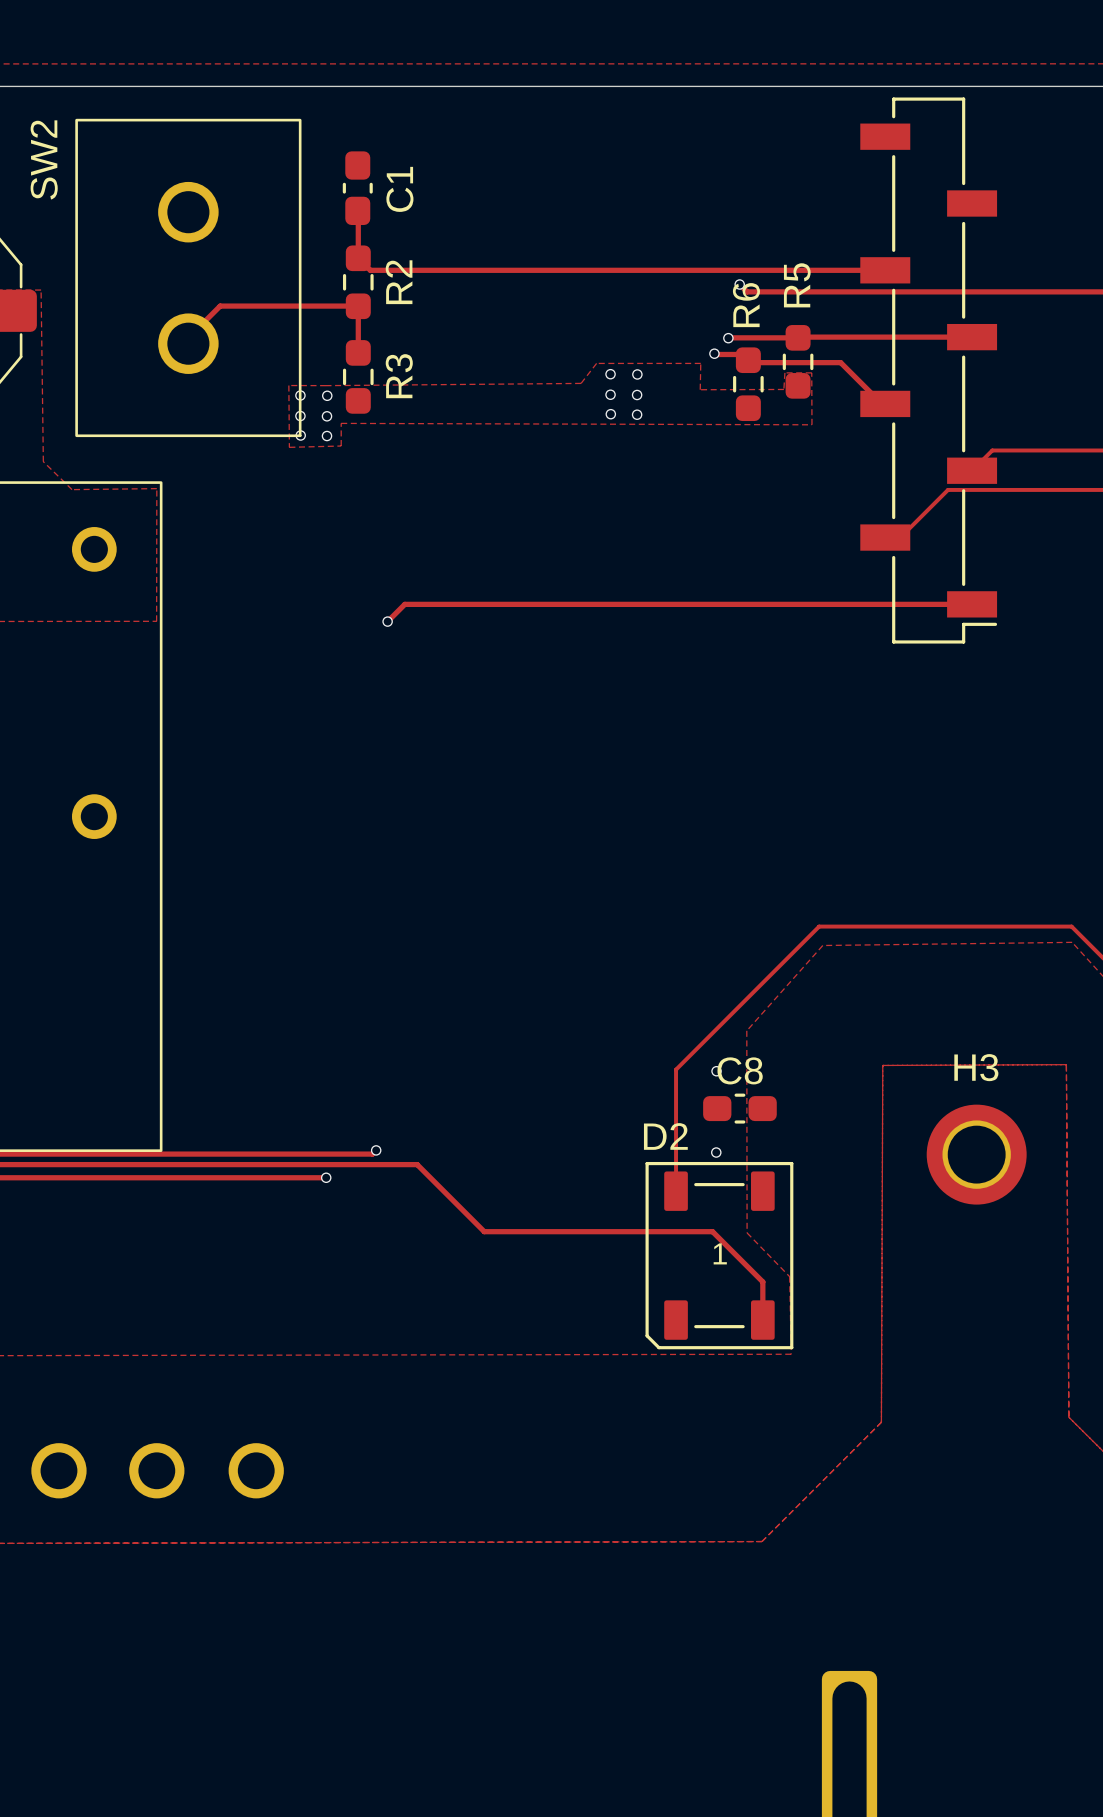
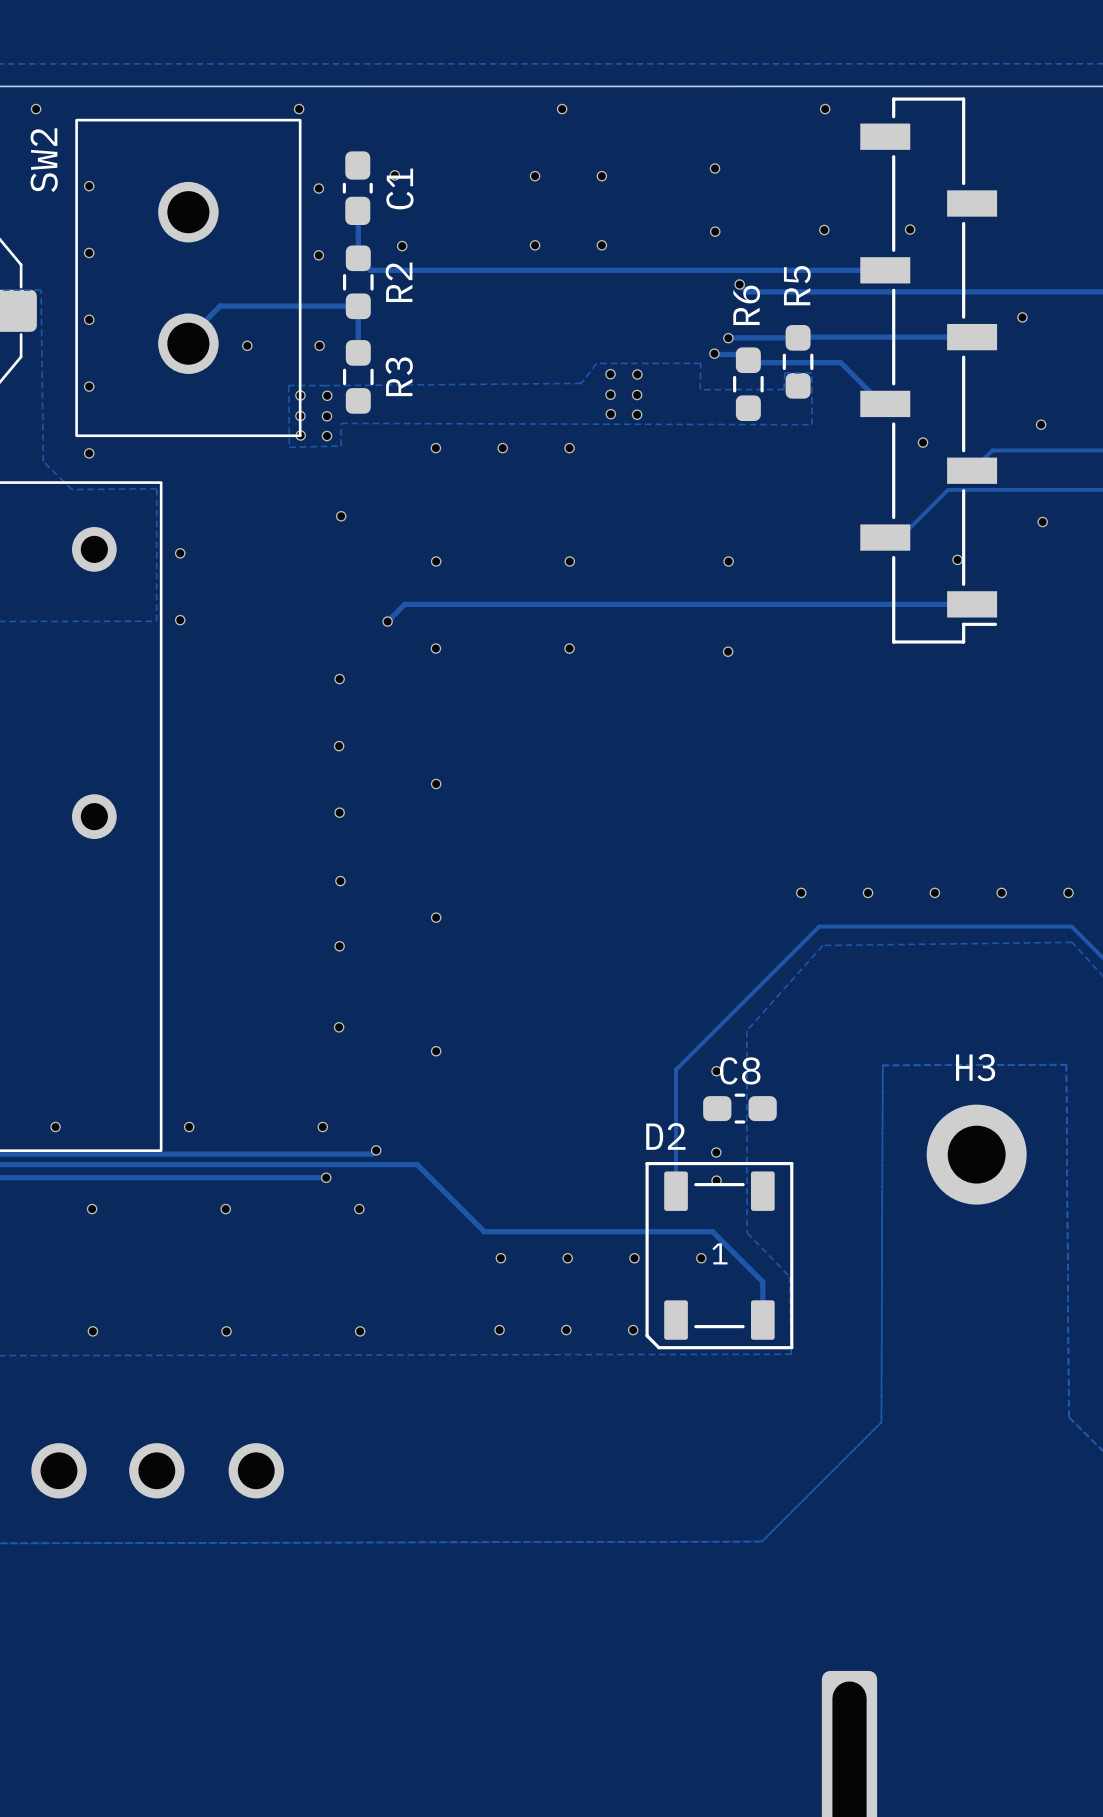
via: none -> (36, 109)
via: none -> (299, 109)
via: none -> (562, 109)
via: none -> (825, 109)
via: none -> (714, 168)
via: none -> (394, 175)
via: none -> (535, 176)
via: none -> (601, 176)
via: none -> (89, 186)
via: none -> (318, 188)
via: none -> (910, 229)
via: none -> (824, 230)
via: none -> (715, 231)
via: none -> (535, 245)
via: none -> (601, 245)
via: none -> (402, 246)
via: none -> (89, 252)
via: none -> (318, 255)
via: none -> (1022, 317)
via: none -> (89, 319)
via: none -> (247, 345)
via: none -> (319, 345)
via: none -> (89, 386)
via: none -> (1041, 424)
via: none -> (923, 442)
via: none -> (435, 448)
via: none -> (502, 448)
via: none -> (569, 448)
via: none -> (89, 453)
via: none -> (341, 516)
via: none -> (1042, 522)
via: none -> (180, 553)
via: none -> (957, 559)
via: none -> (436, 561)
via: none -> (569, 561)
via: none -> (728, 561)
via: none -> (180, 620)
via: none -> (435, 648)
via: none -> (569, 648)
via: none -> (728, 651)
via: none -> (339, 679)
via: none -> (339, 746)
via: none -> (436, 784)
via: none -> (339, 812)
via: none -> (340, 881)
via: none -> (801, 892)
via: none -> (868, 892)
via: none -> (934, 892)
via: none -> (1001, 892)
via: none -> (1068, 892)
via: none -> (436, 917)
via: none -> (339, 946)
via: none -> (339, 1027)
via: none -> (436, 1051)
via: none -> (55, 1127)
via: none -> (189, 1127)
via: none -> (322, 1127)
via: none -> (716, 1180)
via: none -> (92, 1209)
via: none -> (225, 1209)
via: none -> (359, 1209)
via: none -> (500, 1258)
via: none -> (567, 1258)
via: none -> (634, 1258)
via: none -> (701, 1258)
via: none -> (499, 1330)
via: none -> (566, 1330)
via: none -> (633, 1330)
via: none -> (92, 1331)
via: none -> (226, 1331)
via: none -> (360, 1331)

